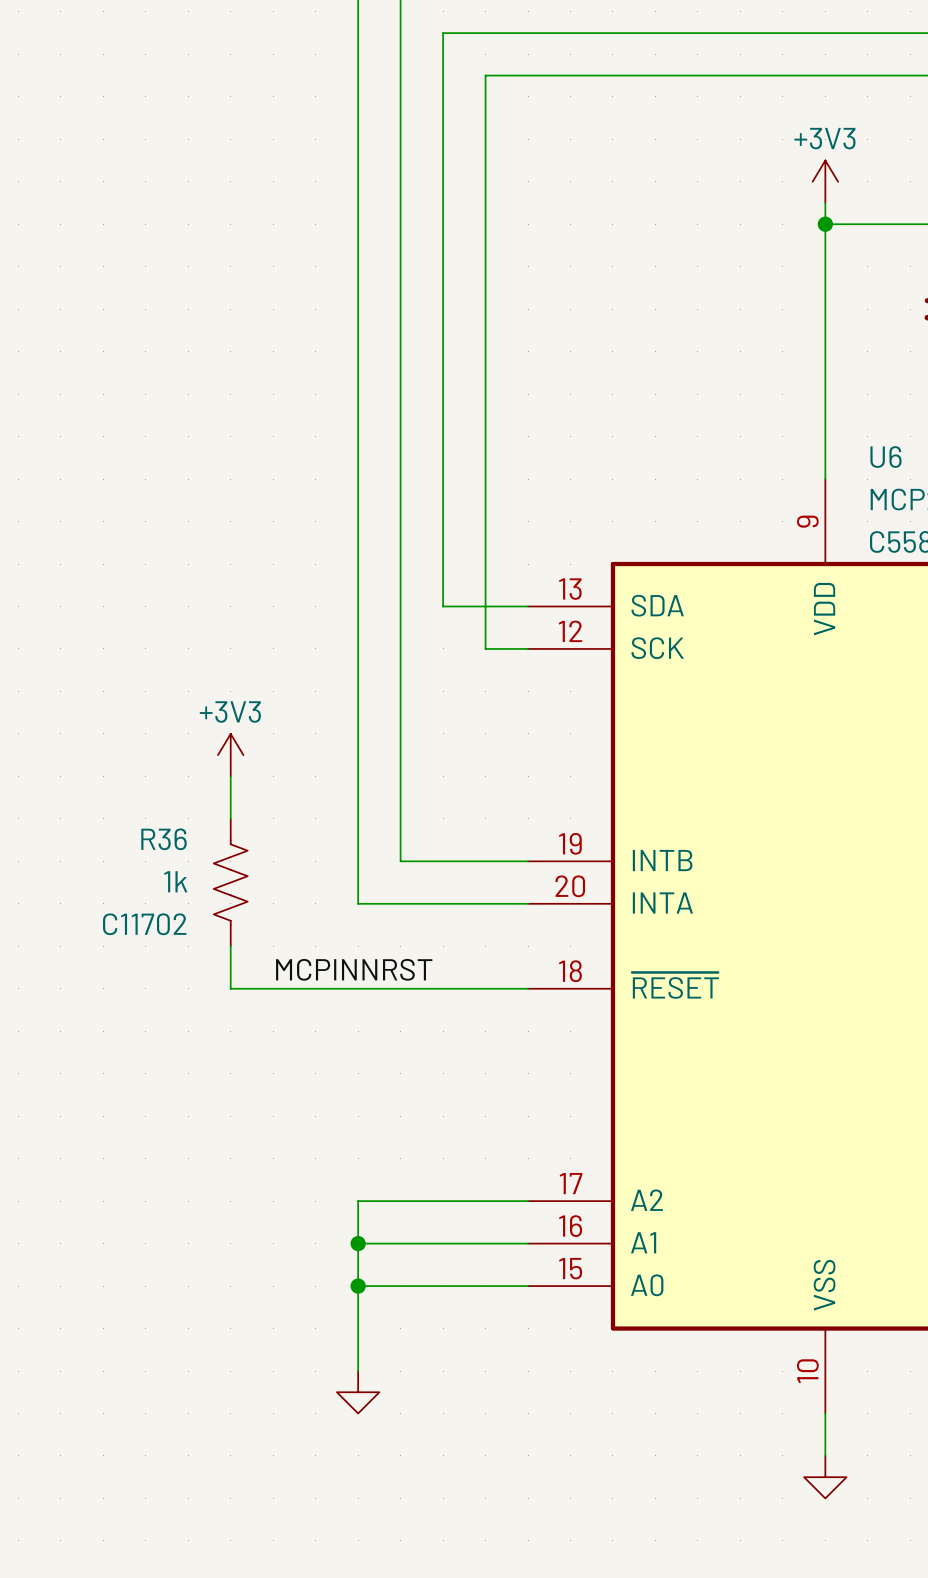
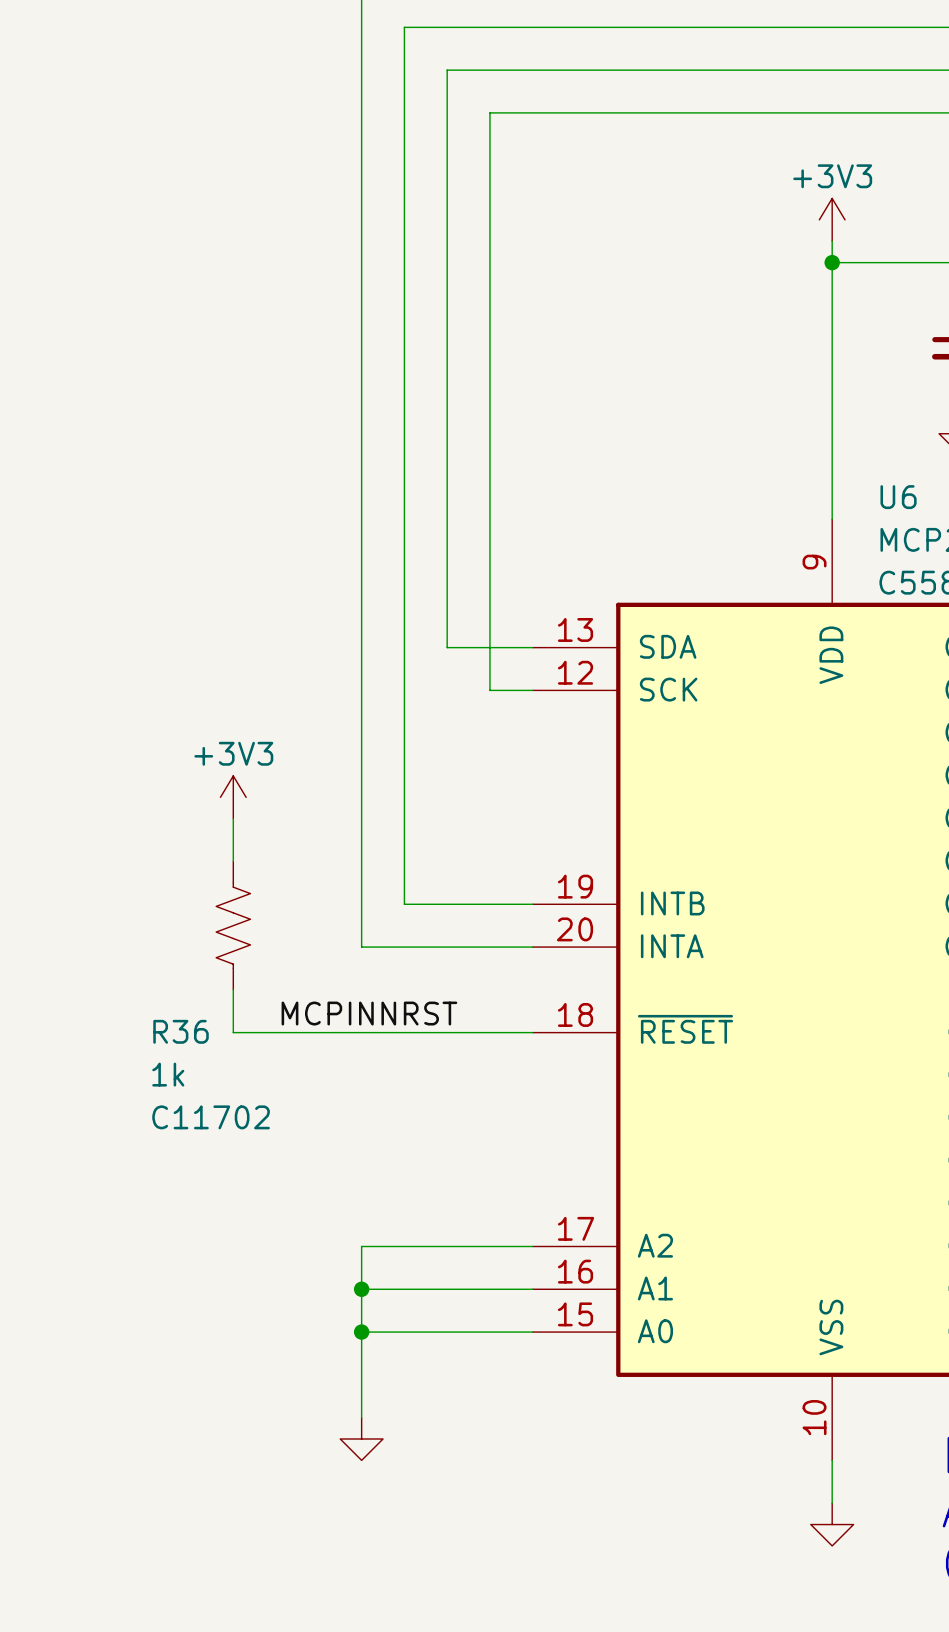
R36 name position: R36 (164, 839) -> R36 (181, 1031)
R36 value position: 1k (175, 881) -> 1k (168, 1074)
R36 text position: C11702 (144, 924) -> C11702 (211, 1117)

